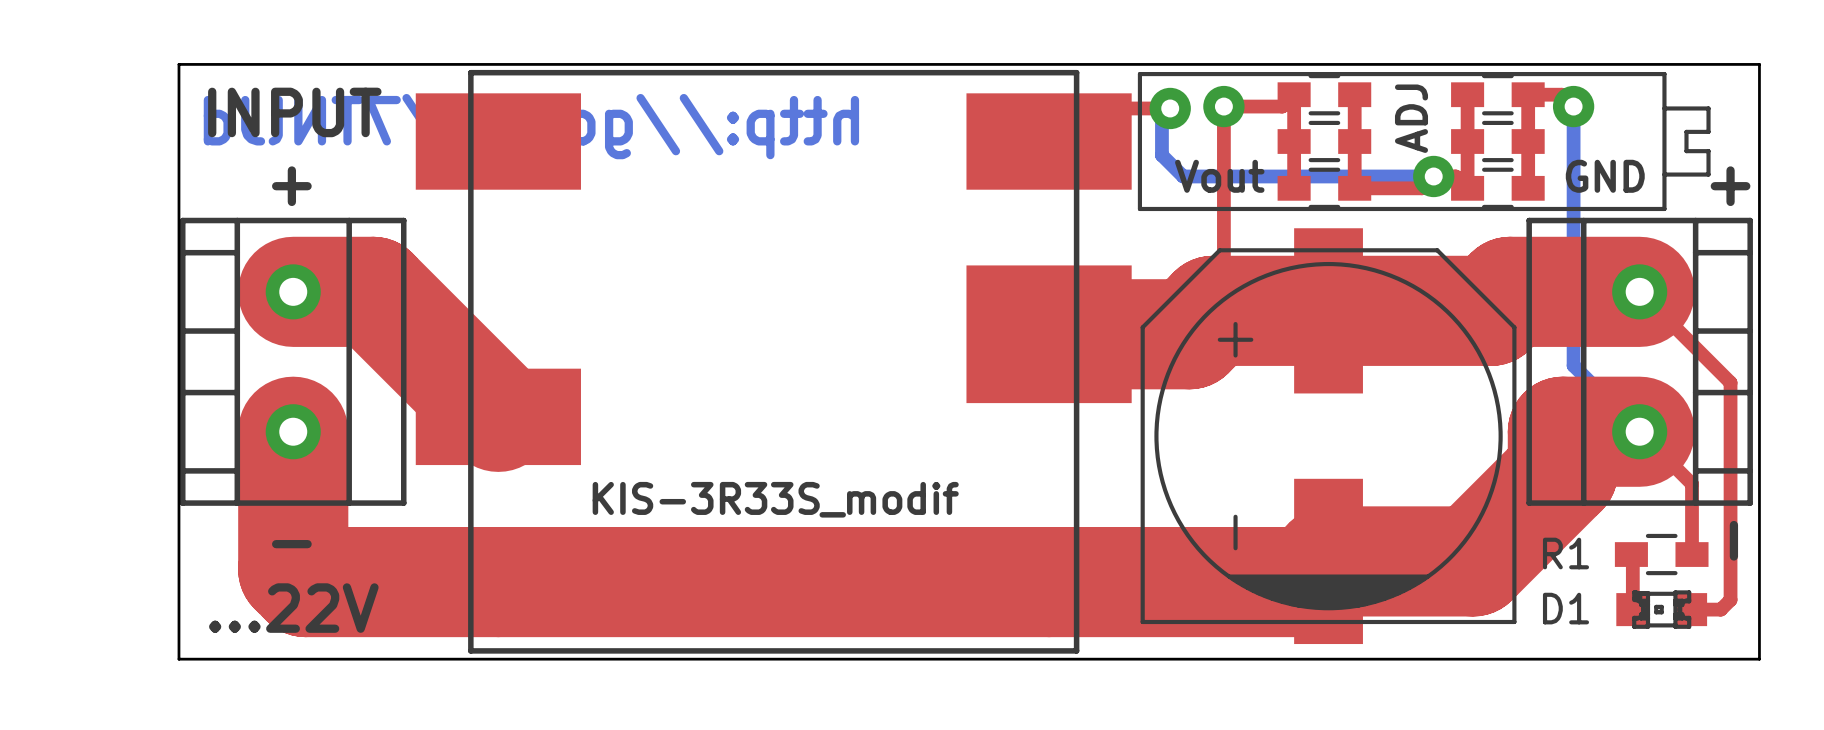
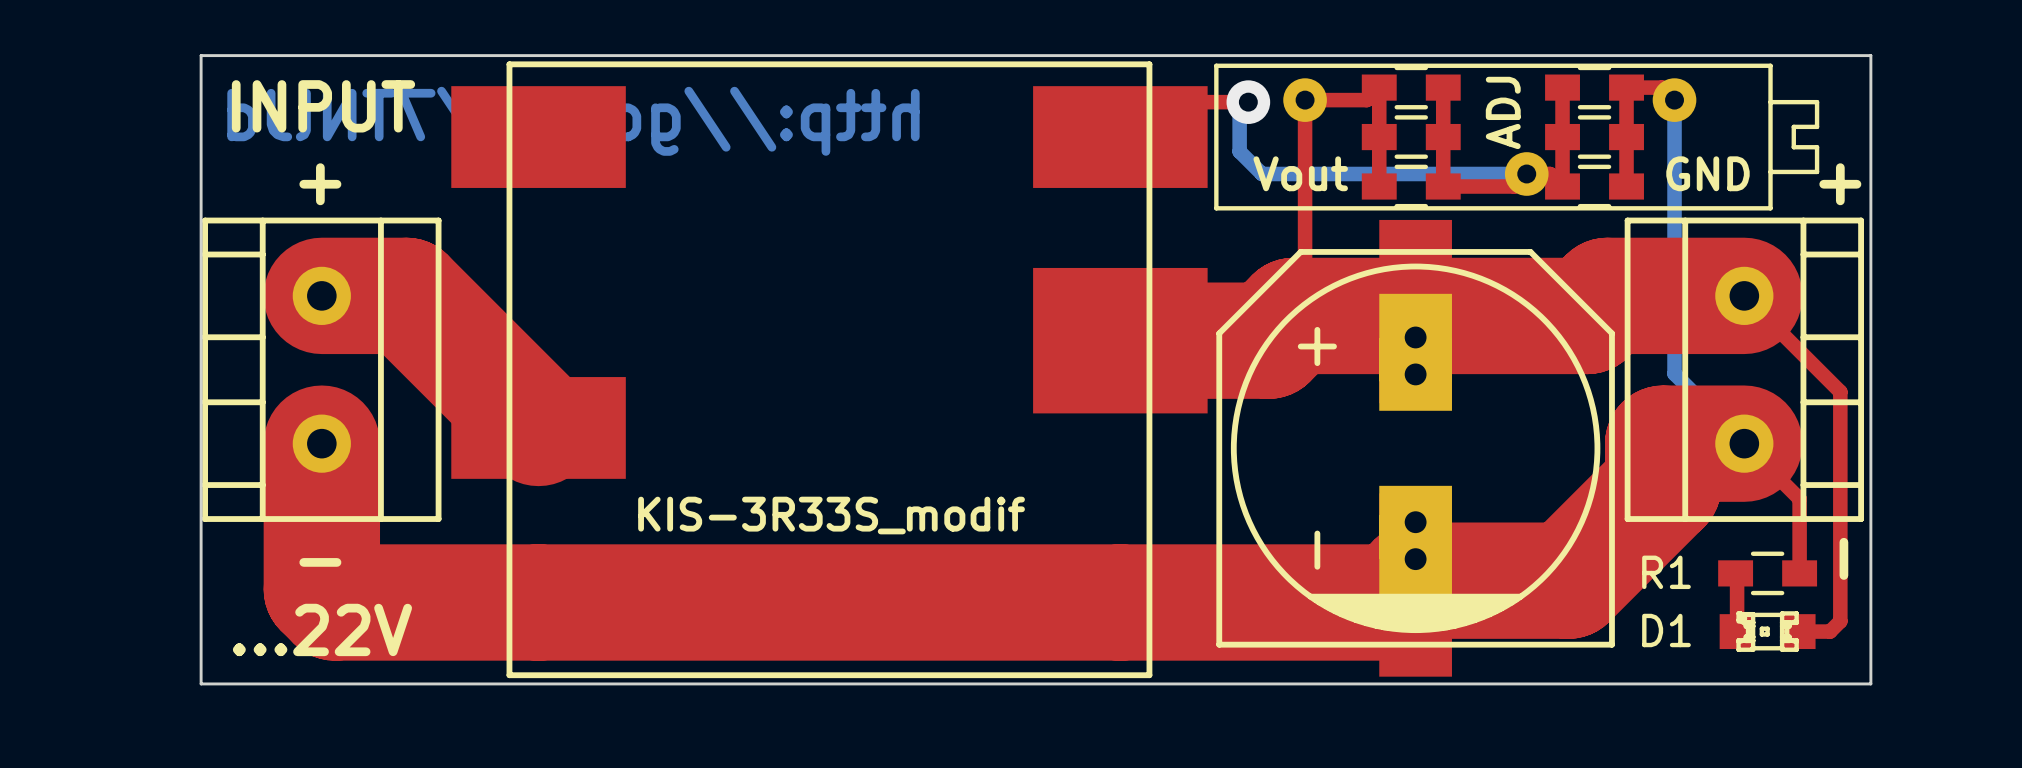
part footprint: [1140, 228, 1517, 645] -> [1216, 219, 1615, 677]

